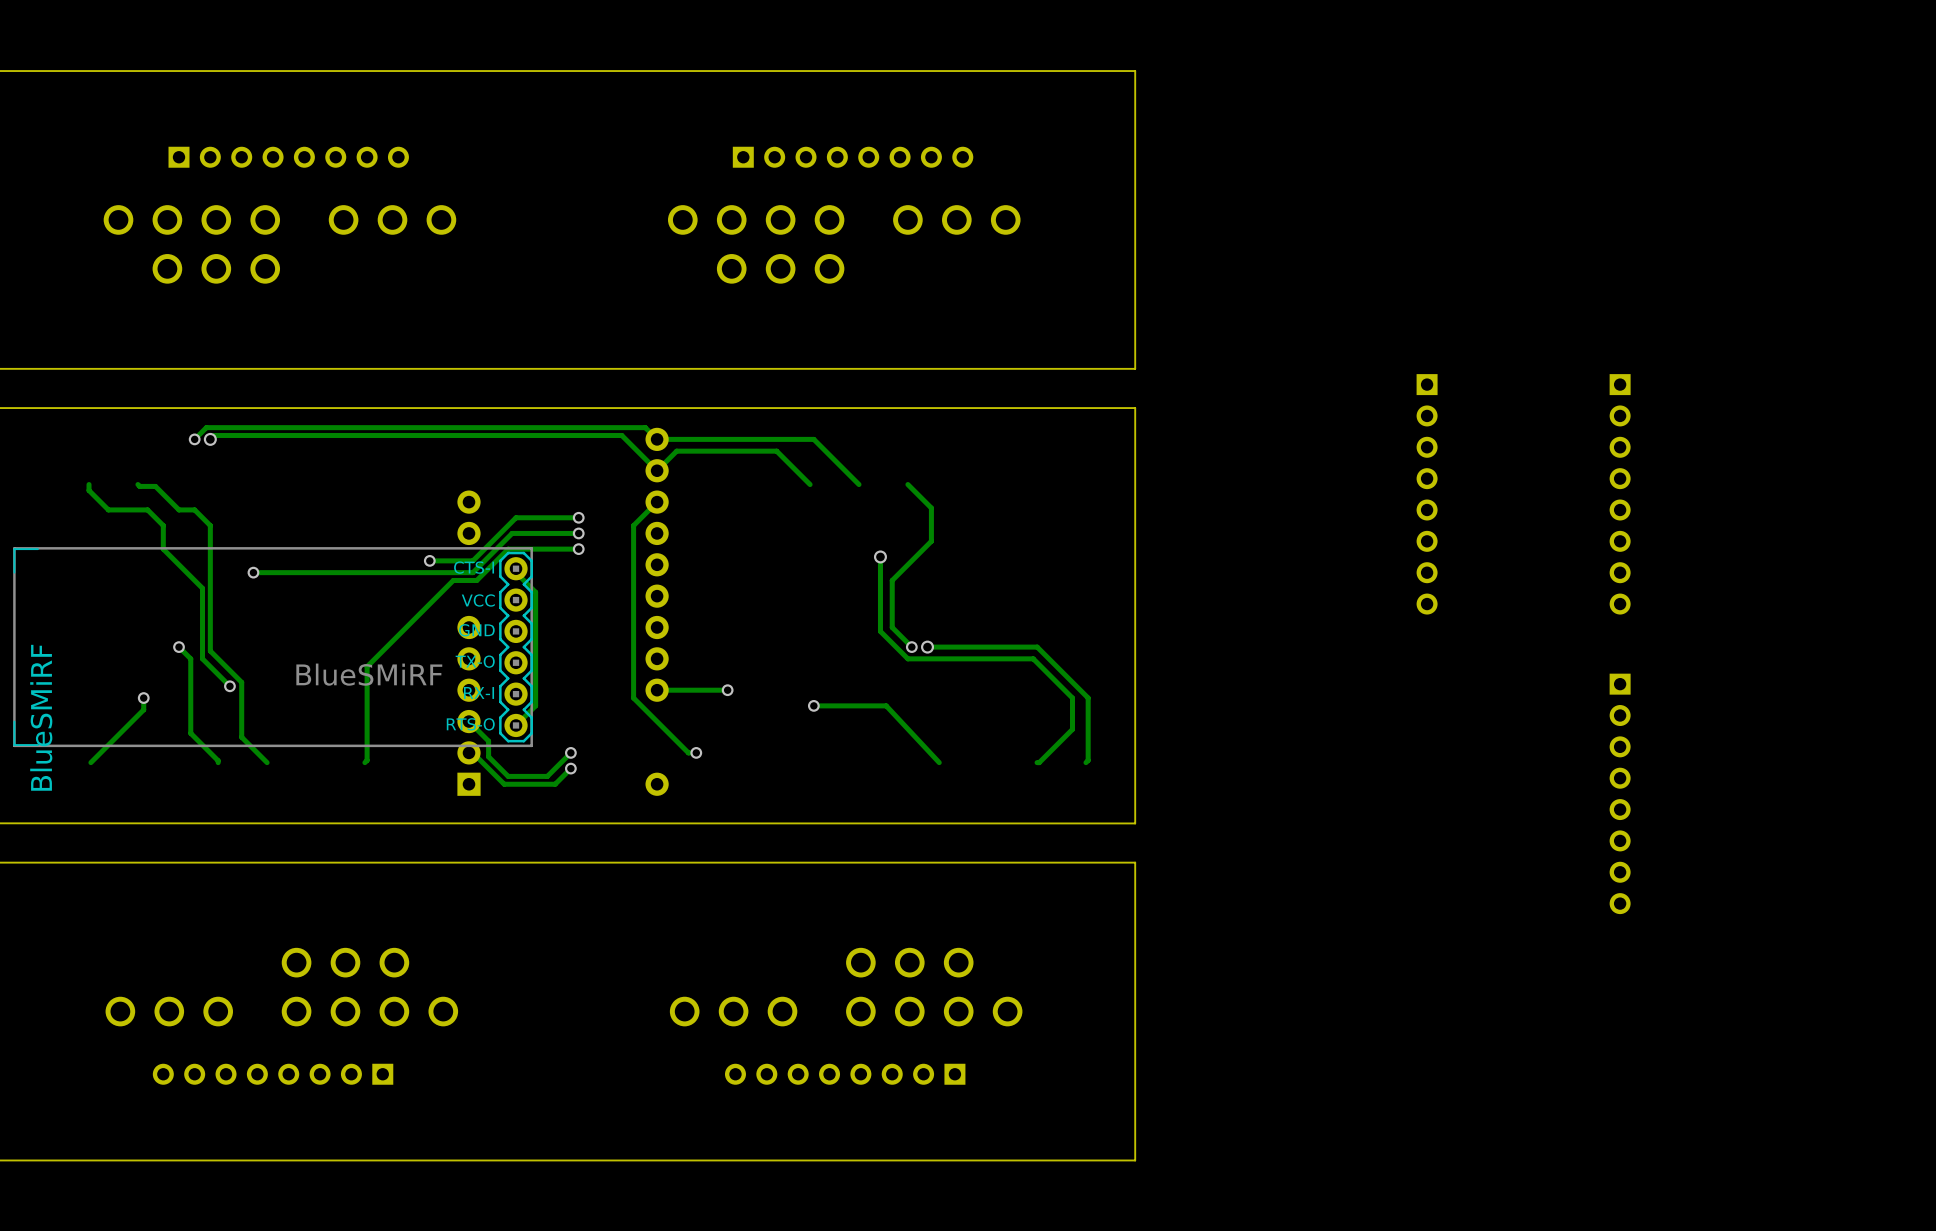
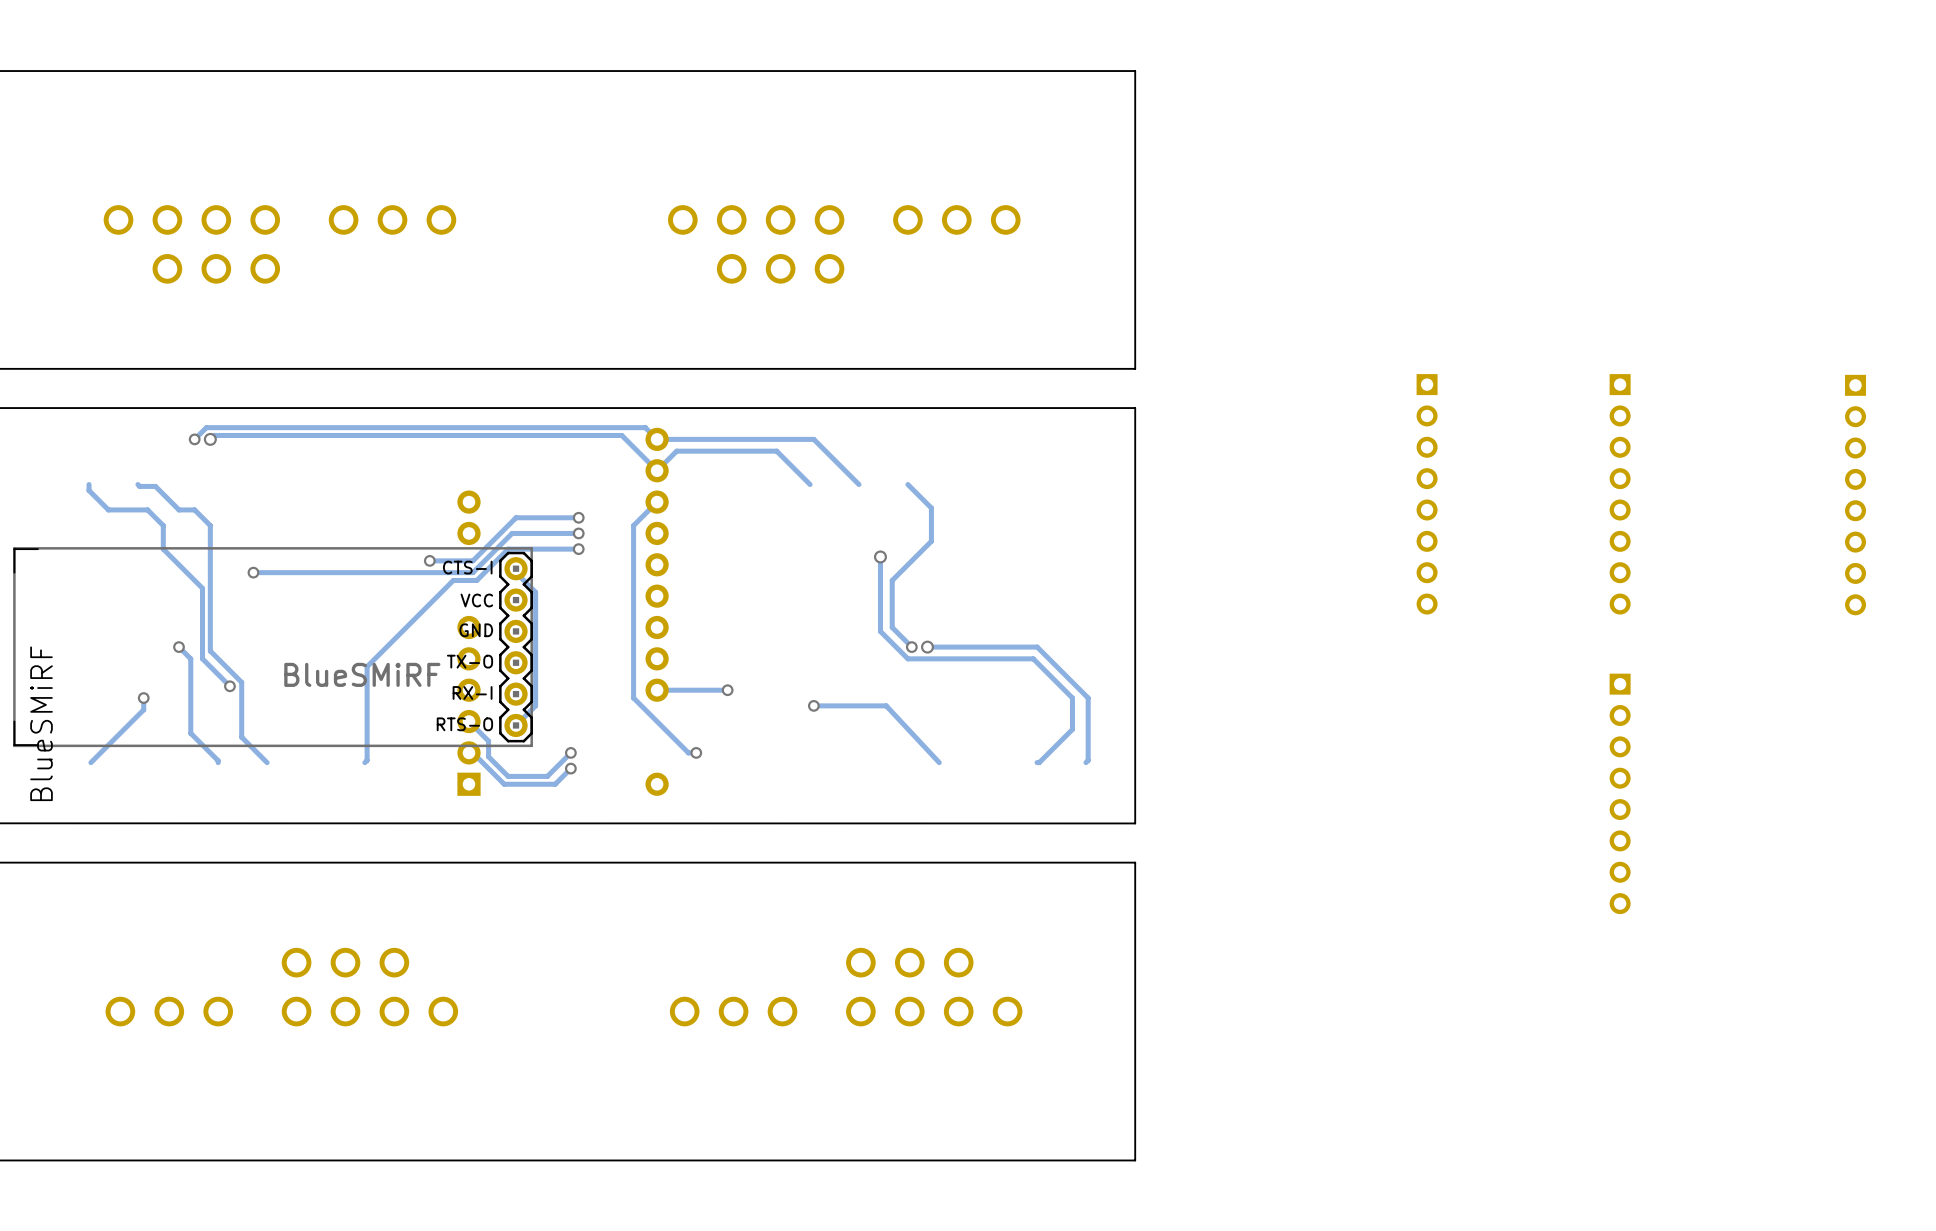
part: (288, 157) -> none
part: (853, 157) -> none
part: none -> (1855, 495)
part: (273, 1074) -> none
part: (845, 1074) -> none

